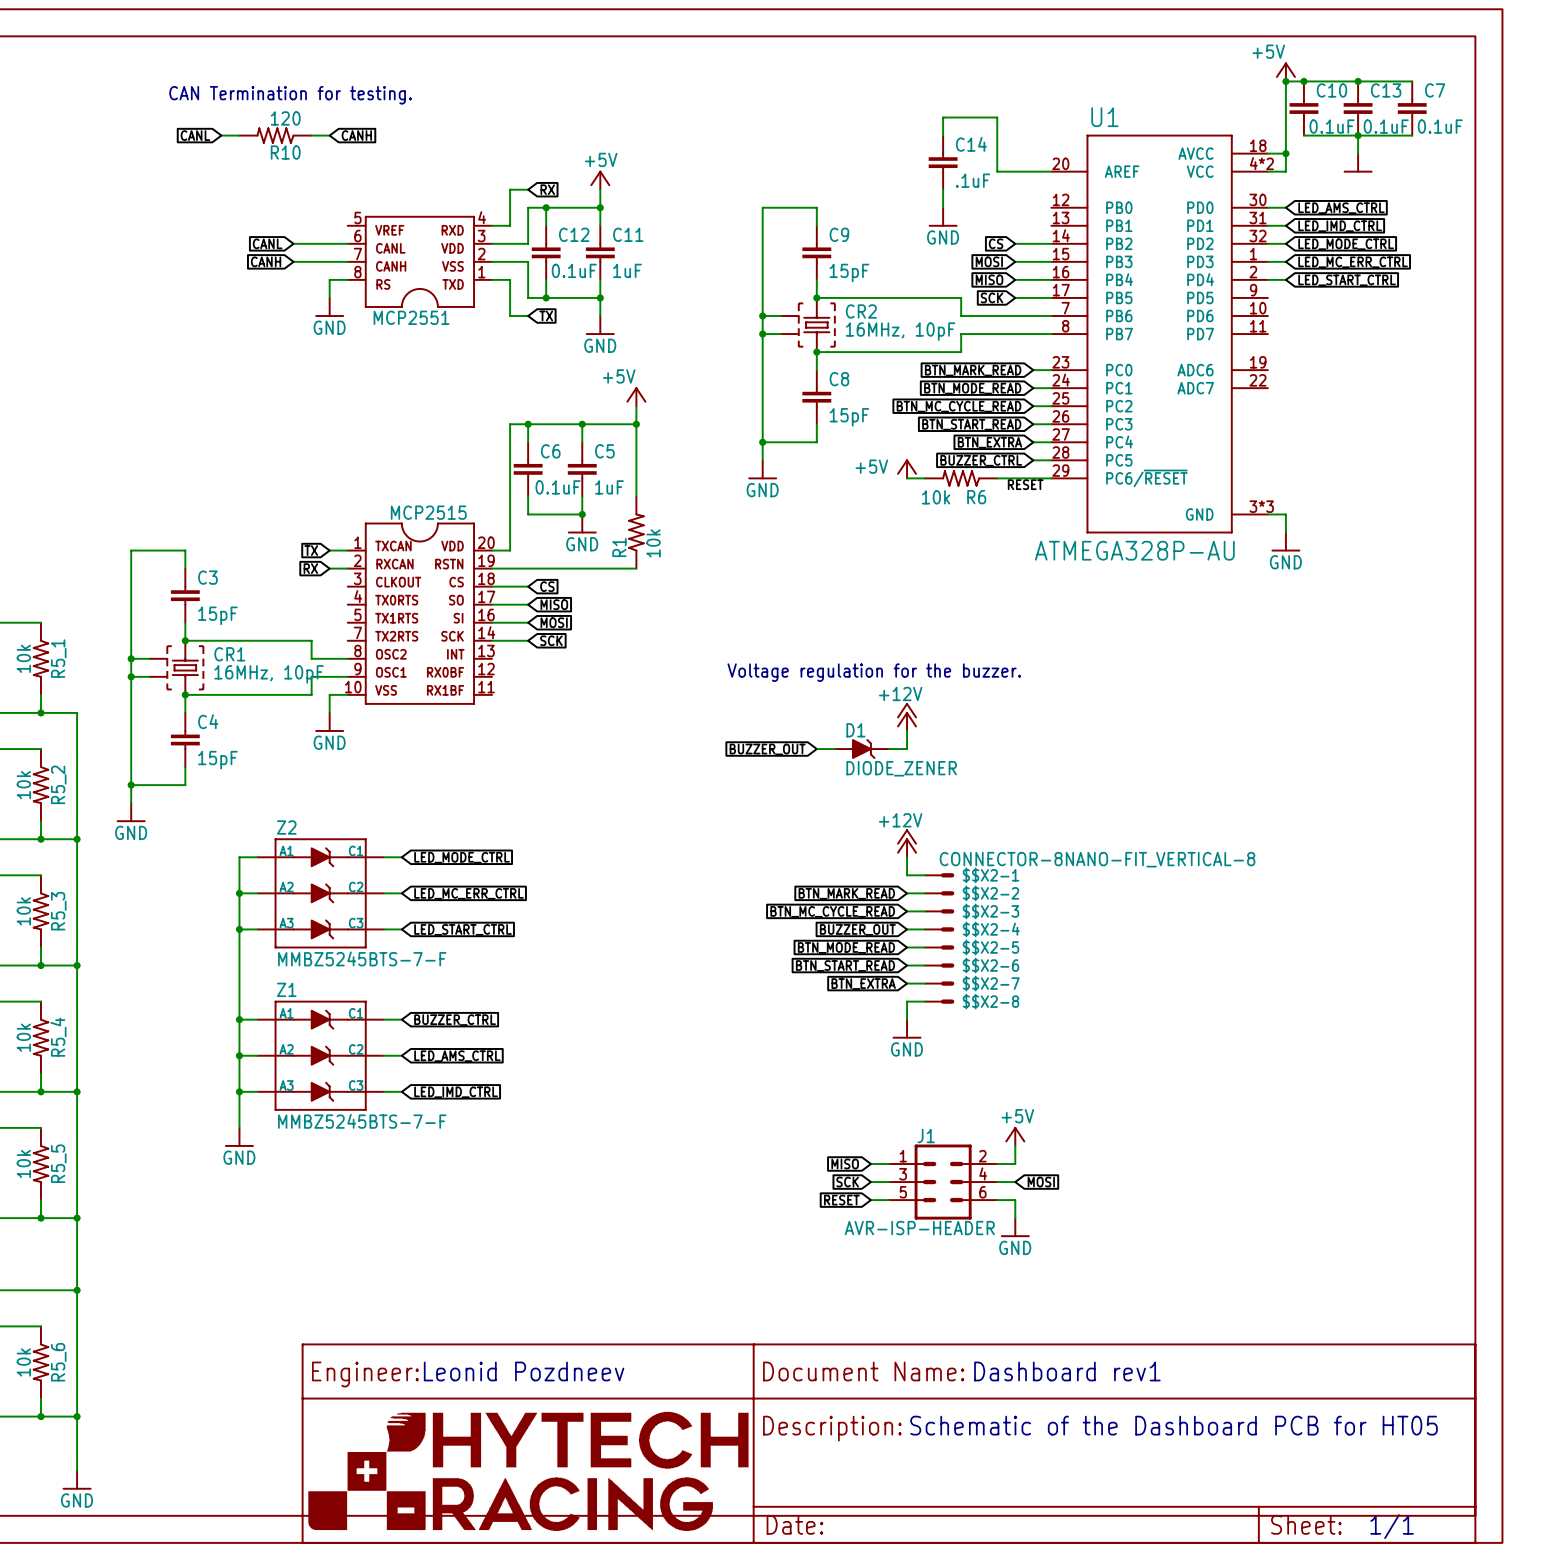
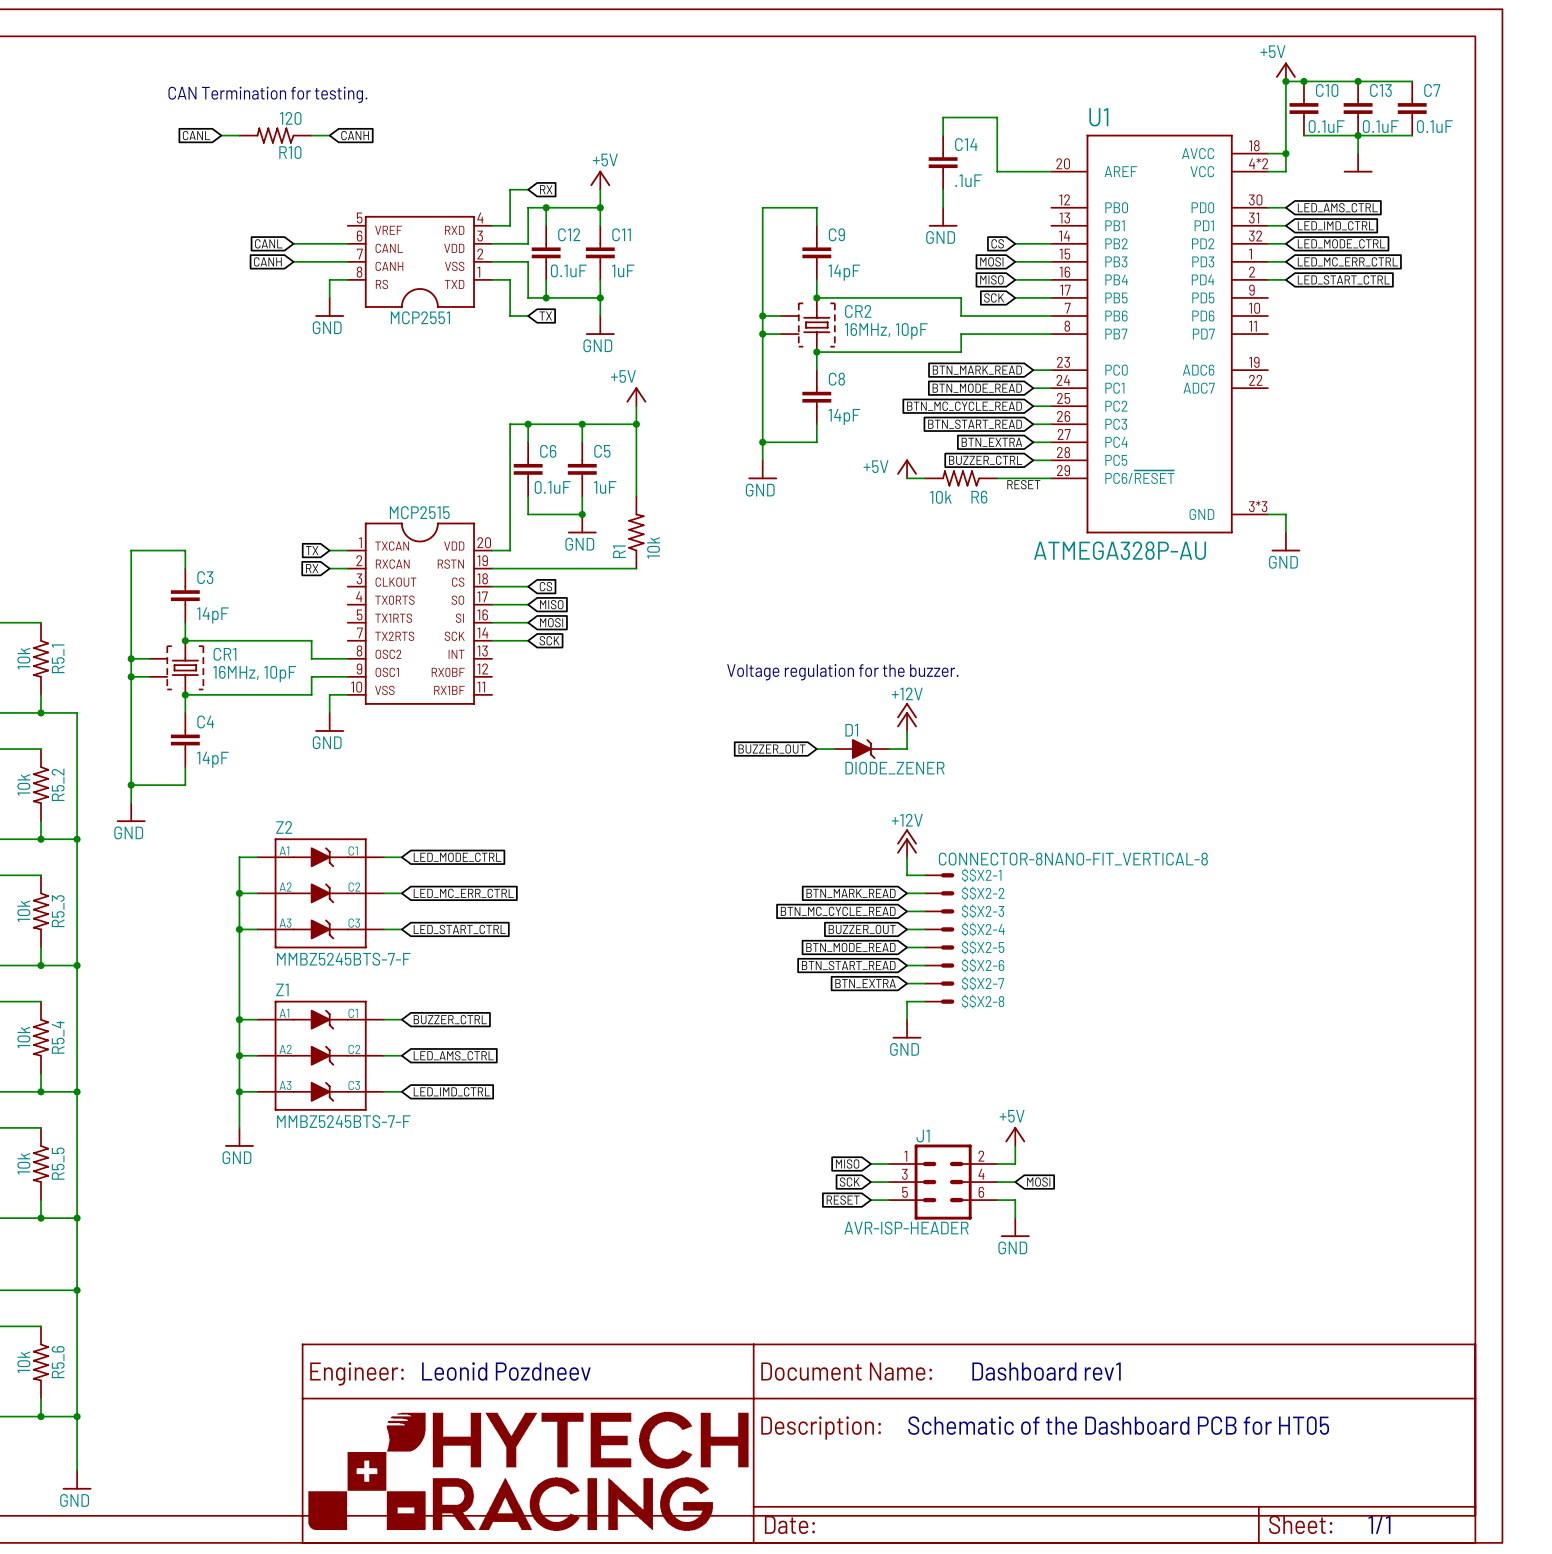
C9 value: 15pF (849, 273) -> 14pF (844, 272)
C8 value: 15pF (849, 417) -> 14pF (844, 416)
C3 value: 15pF (217, 615) -> 14pF (212, 615)
C4 value: 15pF (217, 760) -> 14pF (212, 759)

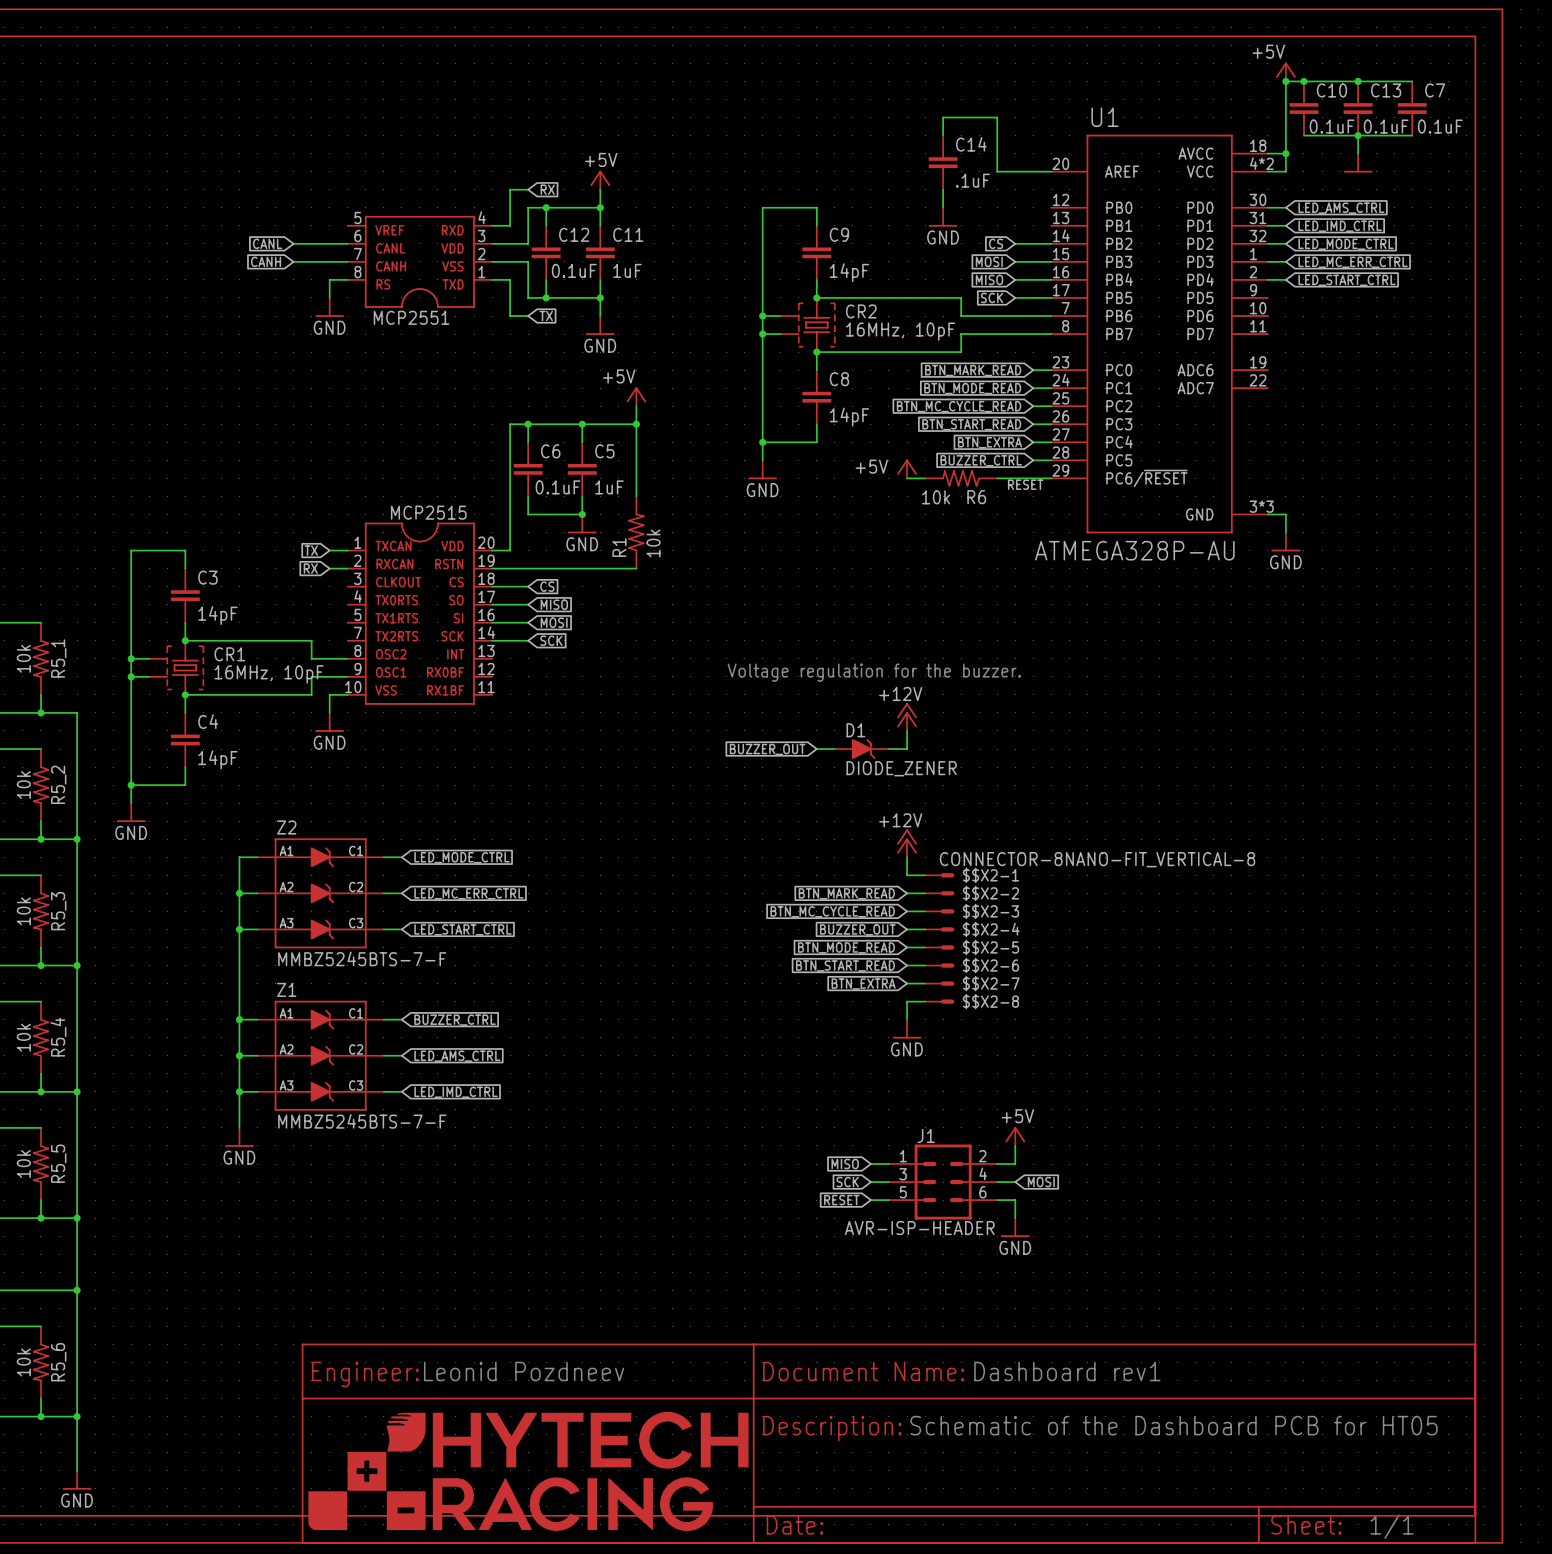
text: CAN Termination for testing. (267, 94) -> none
global label: CANL (196, 135) -> none
wire: (221, 135) (239, 135) -> none
R10: 120 (275, 135) -> none
wire: (311, 135) (329, 135) -> none
global label: CANH (355, 135) -> none

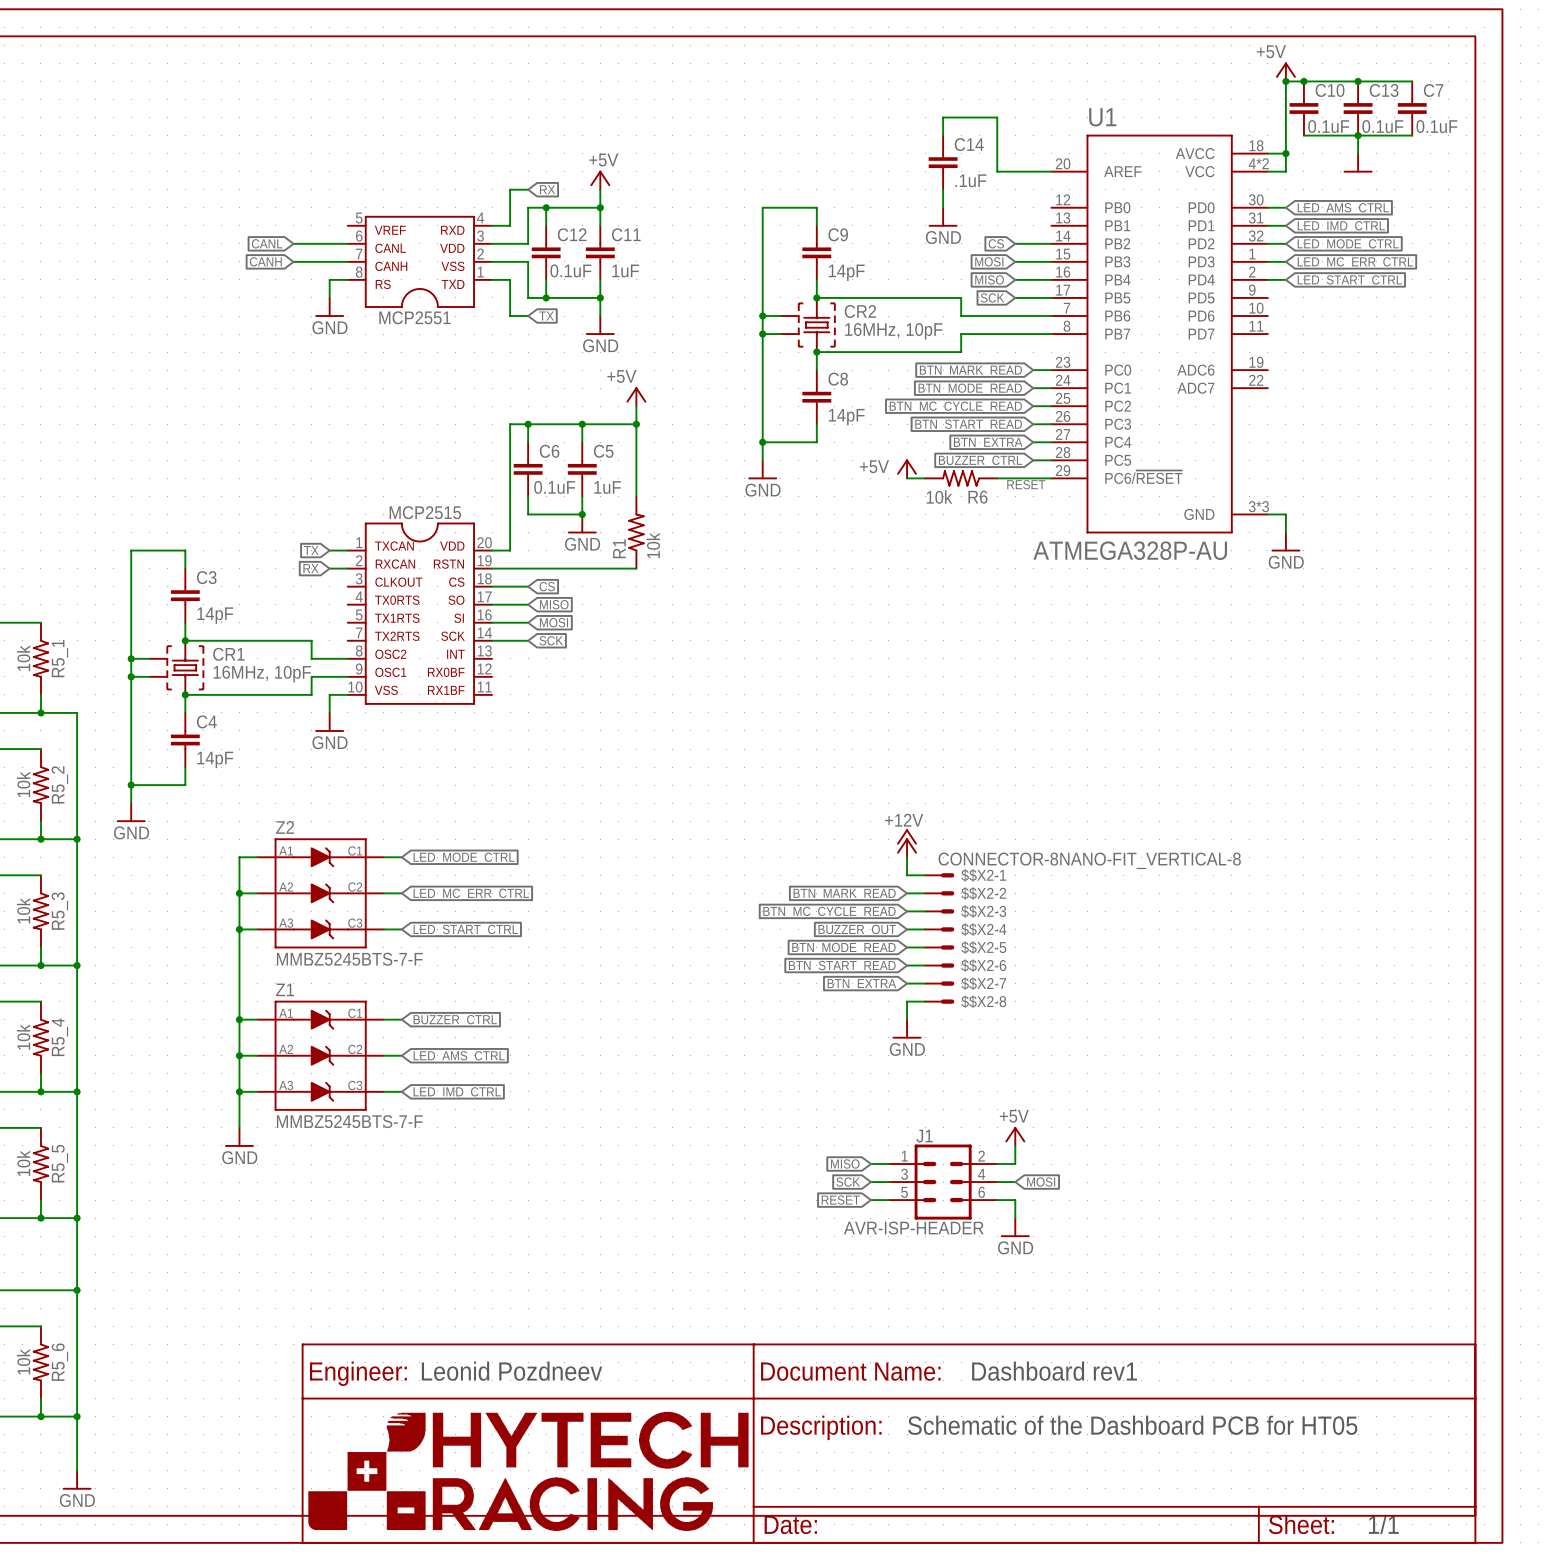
text: Voltage regulation for the buzzer. (874, 672) -> none
power symbol: +12V (907, 717) -> none
wire: (907, 730) (907, 749) (888, 749) -> none
global label: BUZZER_OUT (767, 749) -> none
wire: (816, 749) (834, 749) -> none
D1: DIODE_ZENER (861, 749) -> none

